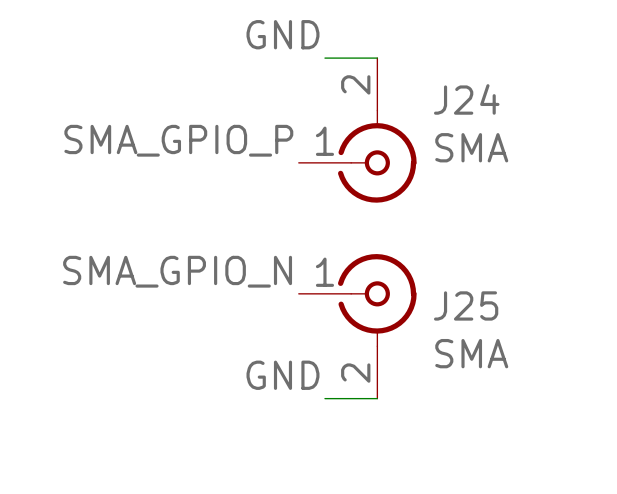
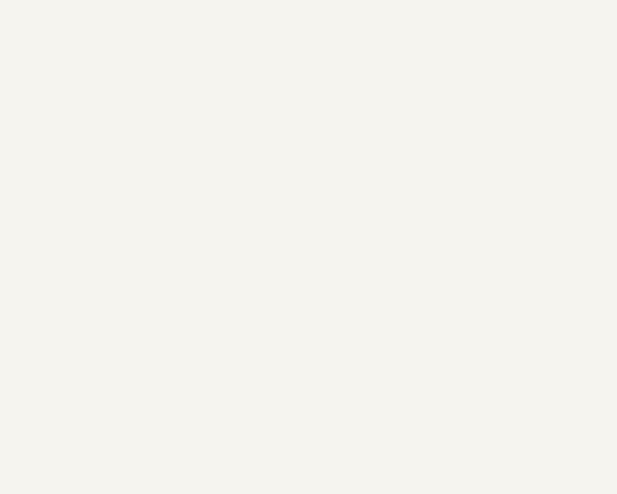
label: GND (282, 34) -> none
wire: (324, 58) (377, 58) -> none
J24: SMA (357, 130) -> none
label: SMA_GPIO_P (178, 140) -> none
label: SMA_GPIO_N (177, 271) -> none
J25: SMA (357, 326) -> none
label: GND (282, 375) -> none
wire: (324, 398) (377, 398) -> none

